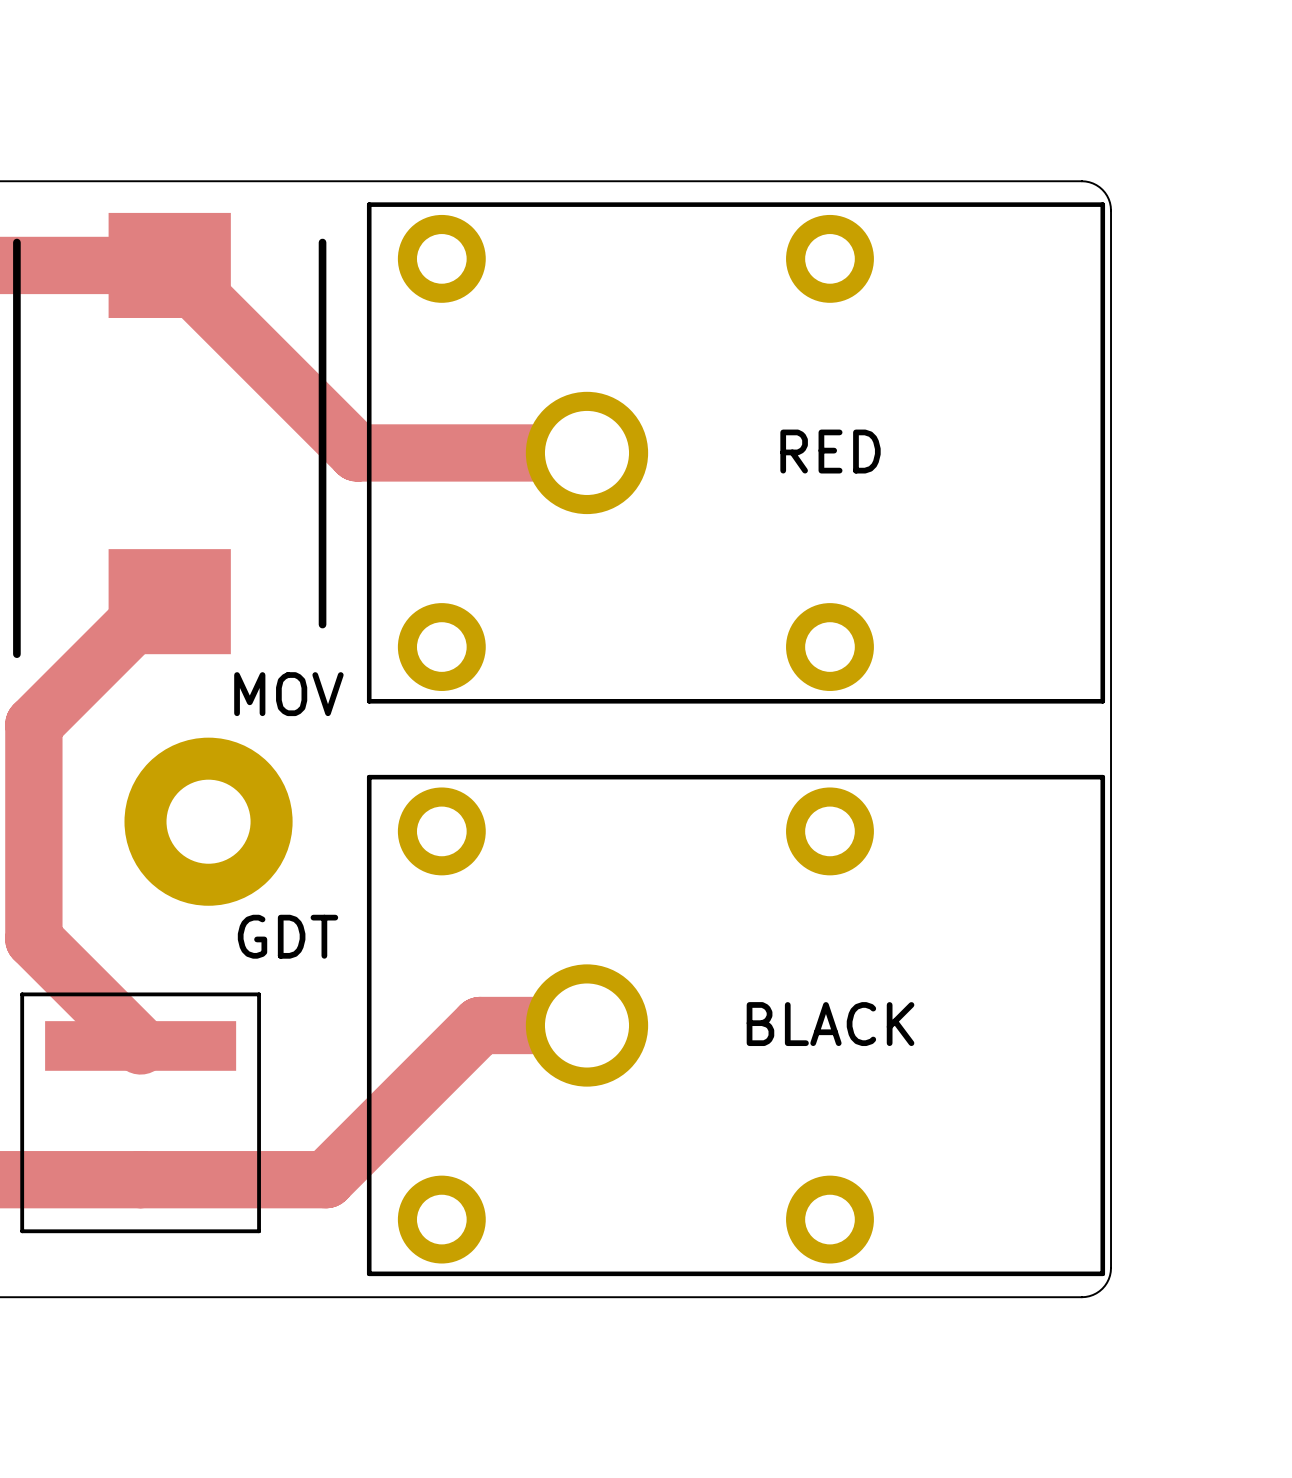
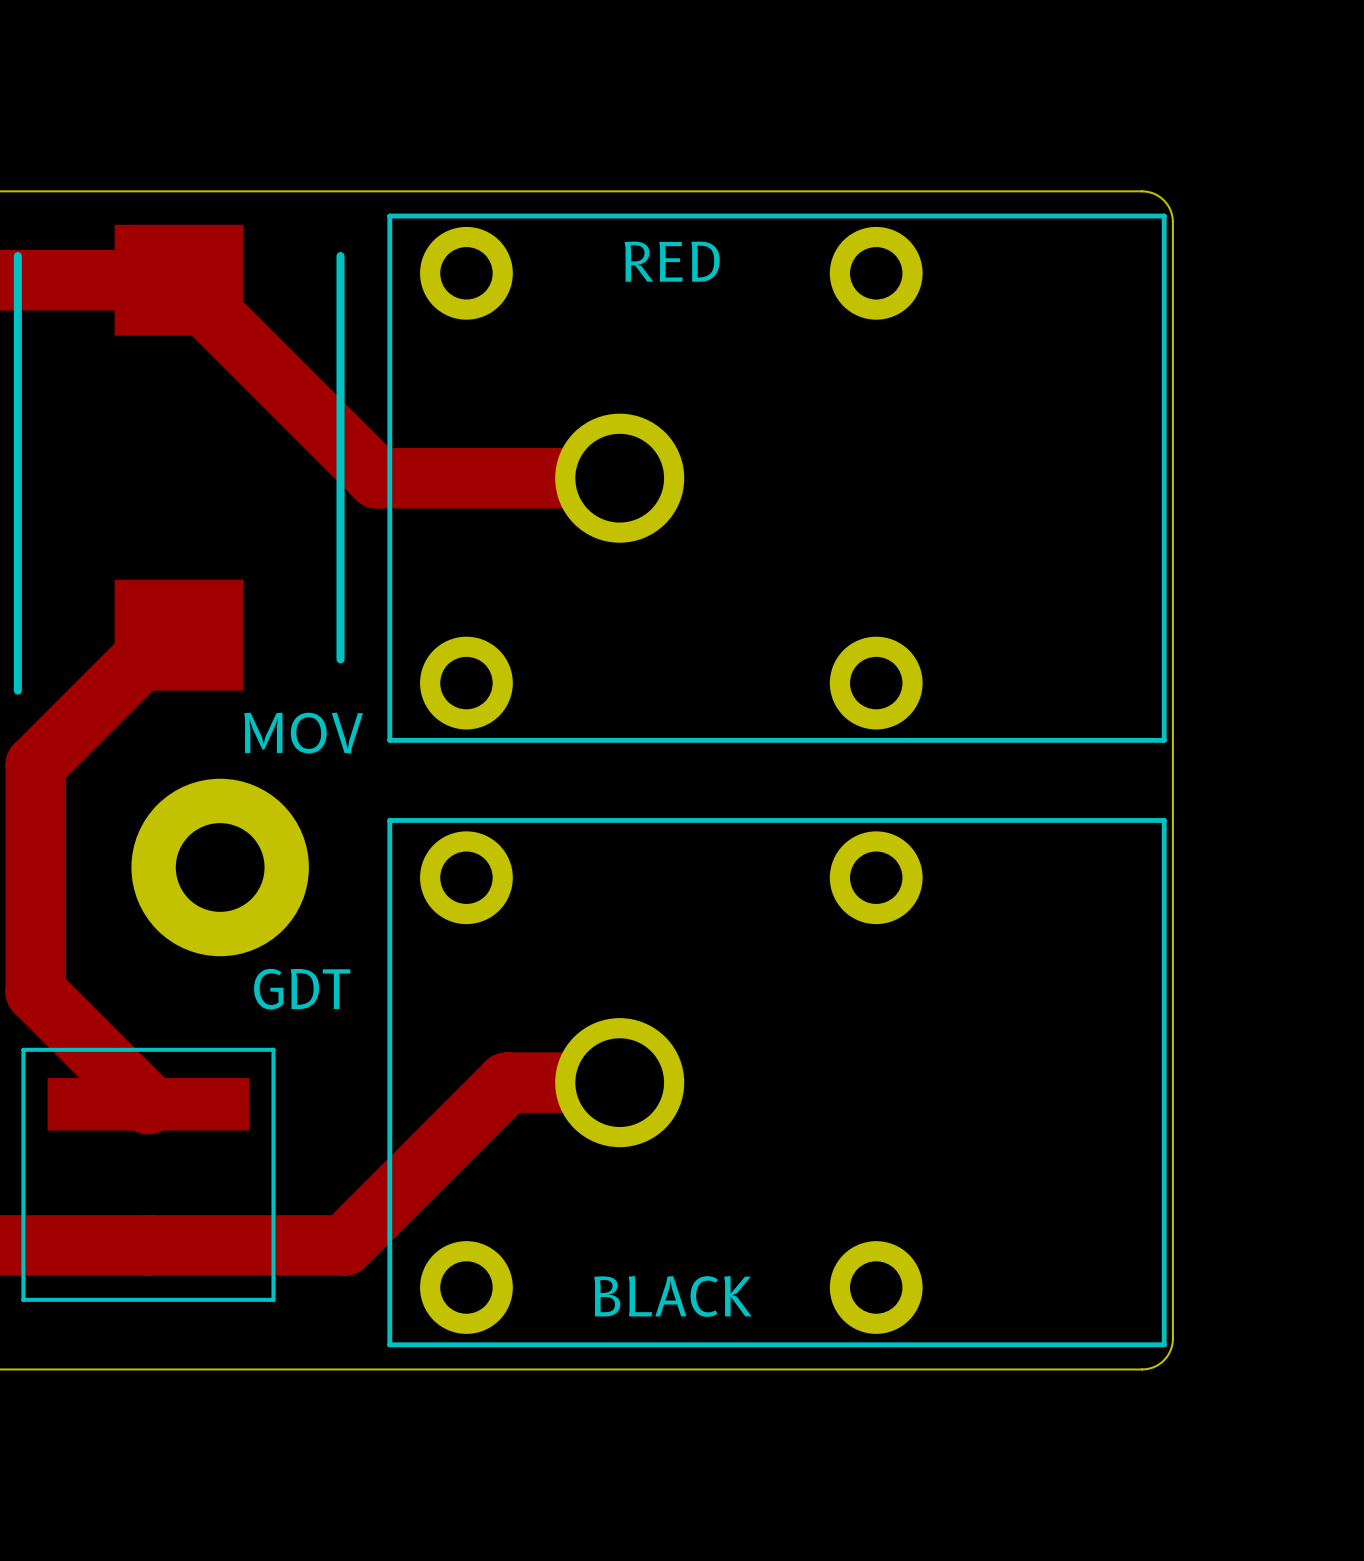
RED name position: RED (830, 451) -> RED (672, 261)
BLACK name position: BLACK (830, 1024) -> BLACK (672, 1296)

